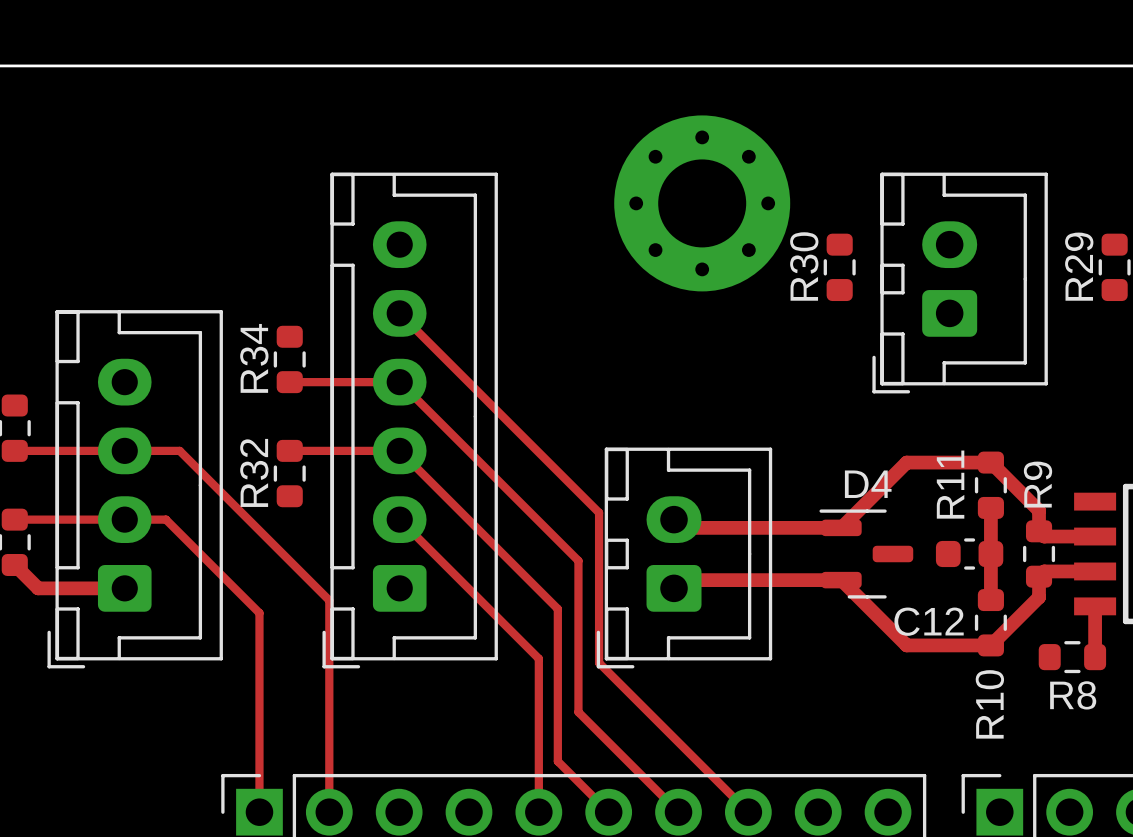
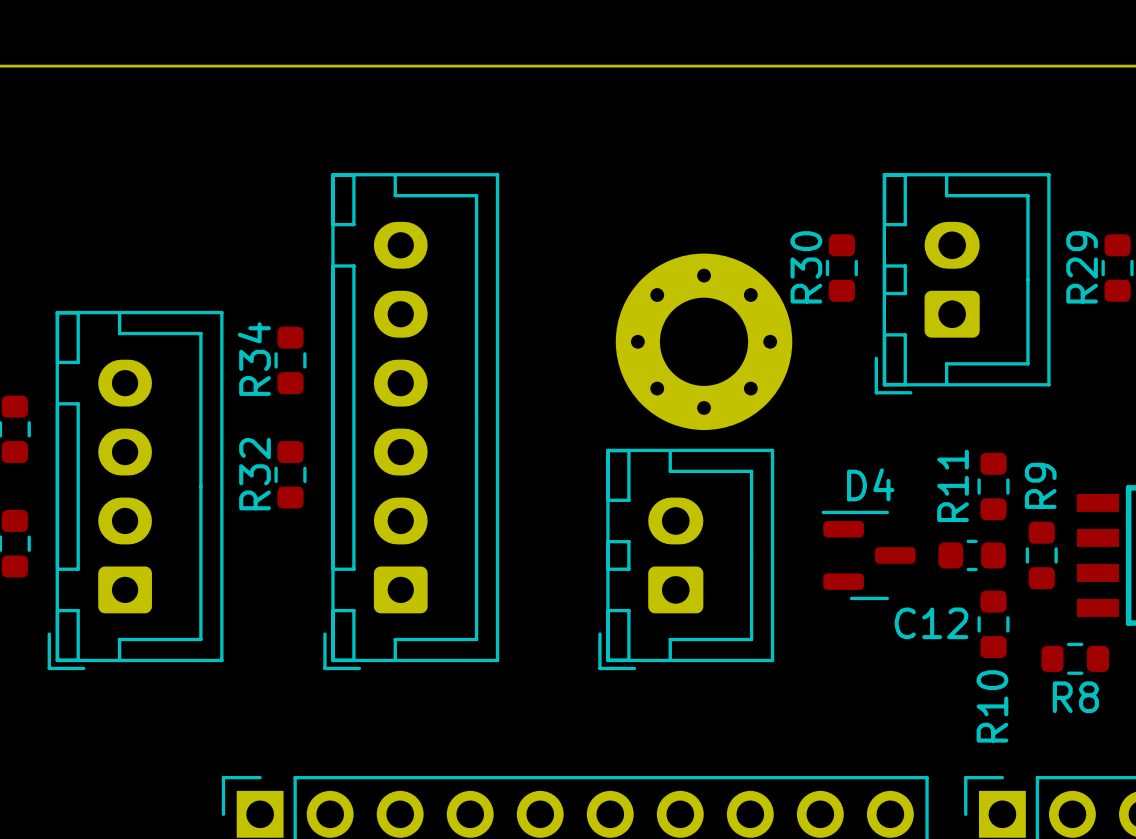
part position: (702, 203) -> (704, 341)
track: (399, 313) (599, 512) (599, 662) (748, 812) -> none
track: (289, 382) (399, 382) (578, 560) (578, 712) (678, 812) -> none
track: (14, 450) (179, 450) (329, 600) (329, 812) -> none
track: (289, 450) (399, 450) (557, 608) (557, 761) (608, 812) -> none
track: (990, 507) (990, 600) -> none
track: (14, 519) (166, 519) (259, 613) (259, 812) -> none
track: (399, 519) (538, 658) (538, 812) -> none
track: (674, 519) (682, 527) (841, 527) (906, 462) (990, 462) (1039, 510) (1039, 531) (1044, 536) (1095, 536) -> none
track: (14, 564) (38, 588) (124, 588) -> none
track: (1095, 571) (1044, 571) (1039, 576) (1039, 597) (990, 645) (906, 645) (841, 580) (682, 580) (674, 588) -> none
track: (1095, 606) (1095, 657) -> none

